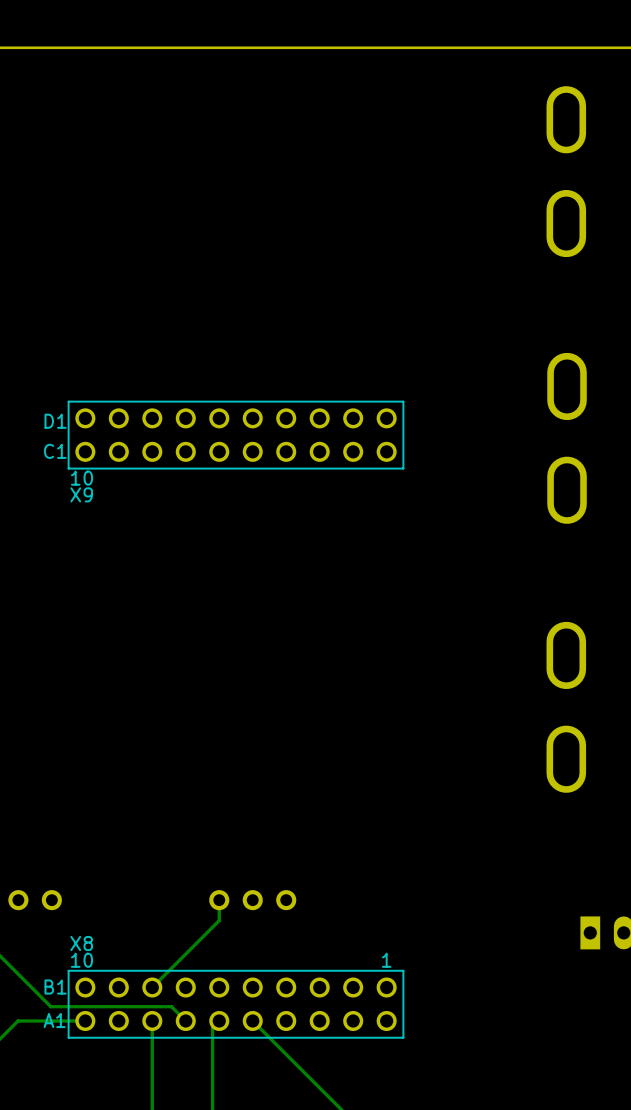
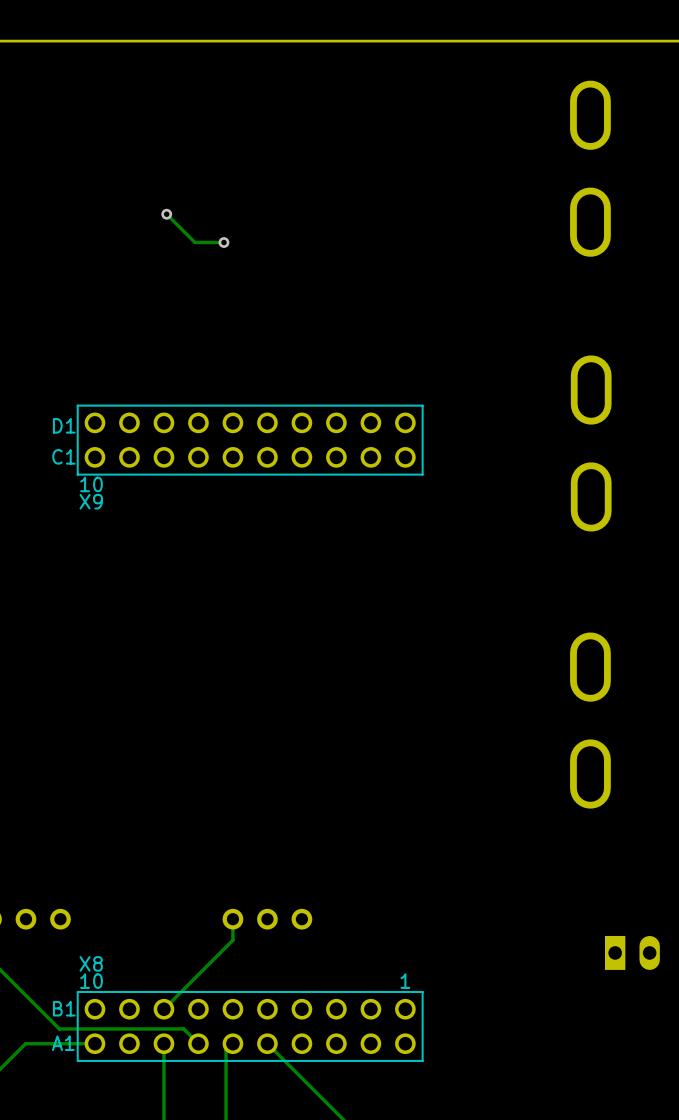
track: none -> (166, 214) (194, 242) (223, 242)
via: none -> (166, 214)
via: none -> (223, 242)

